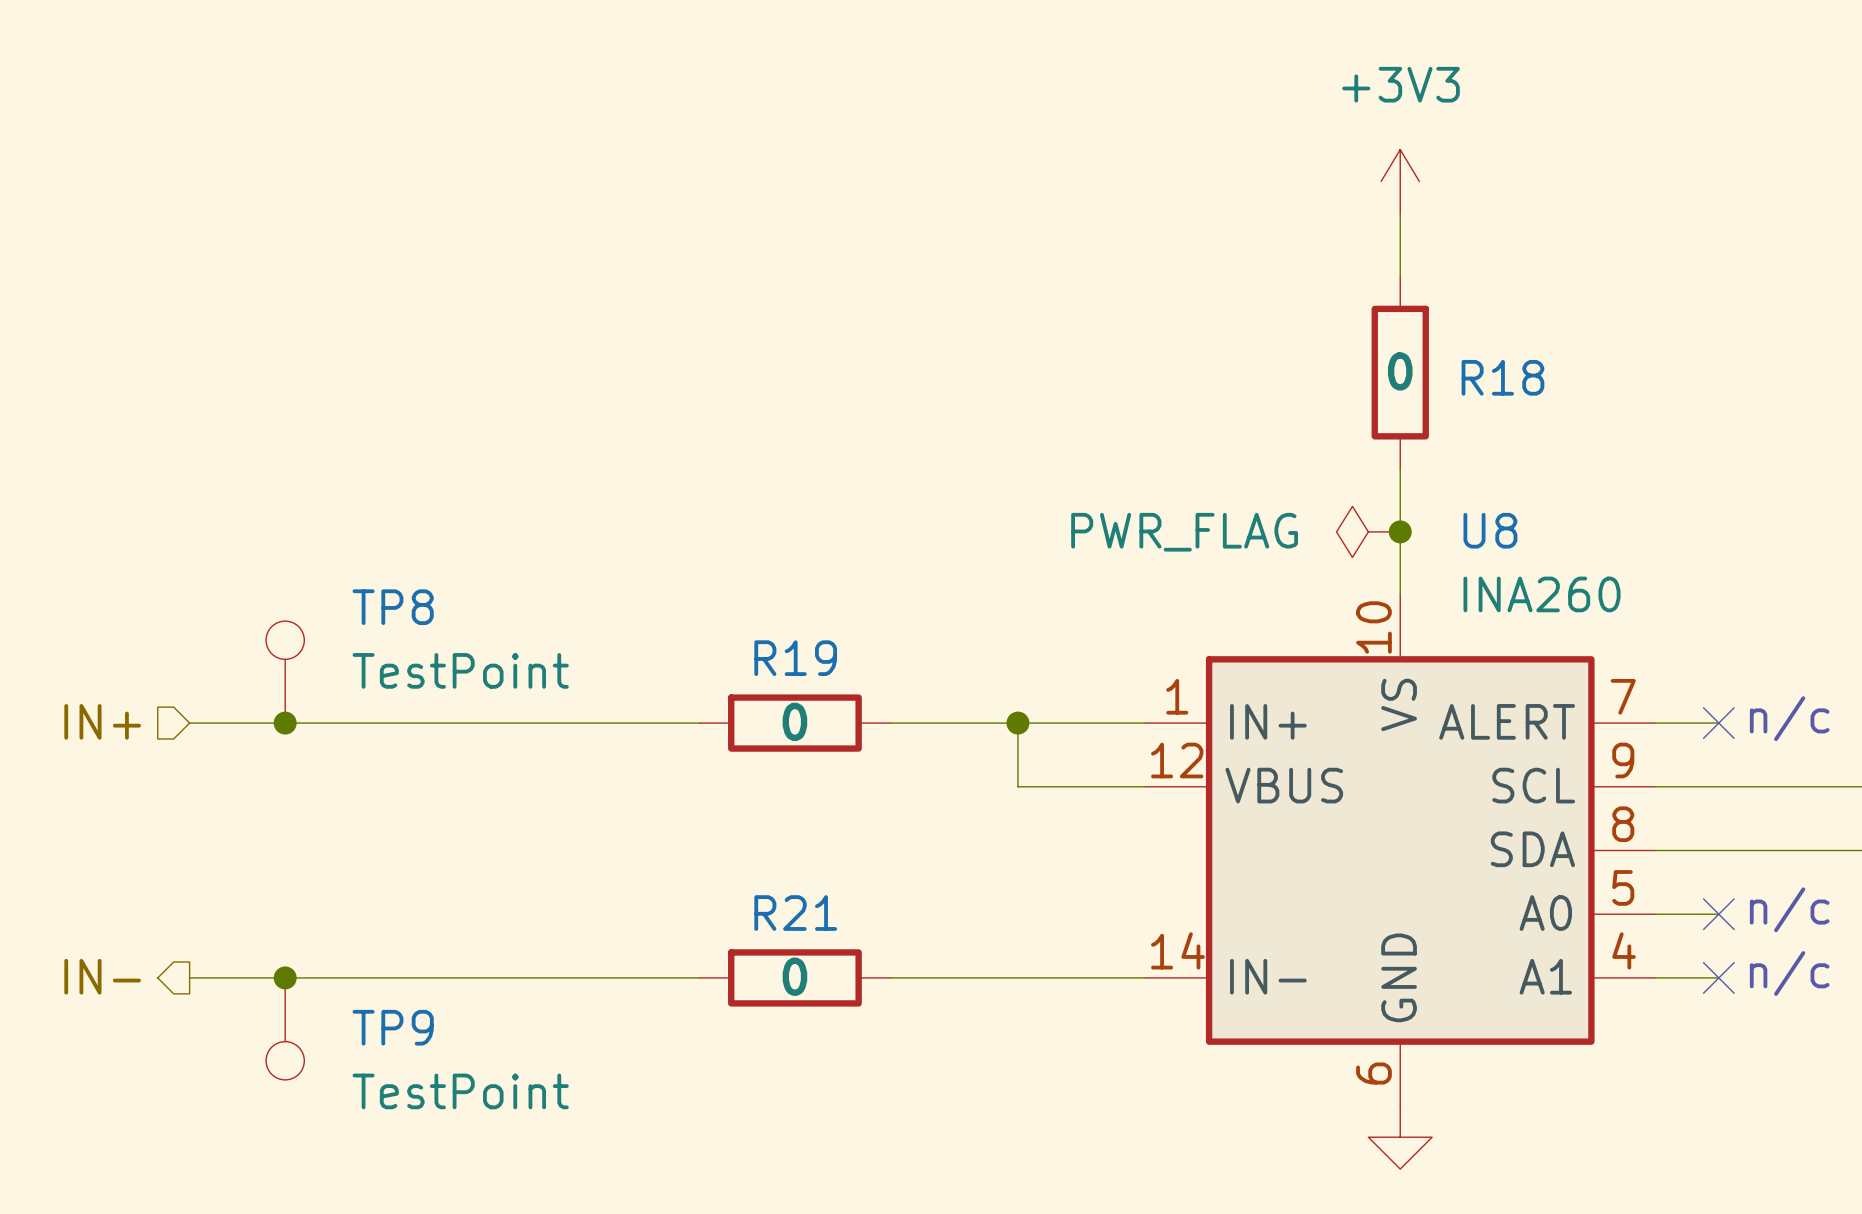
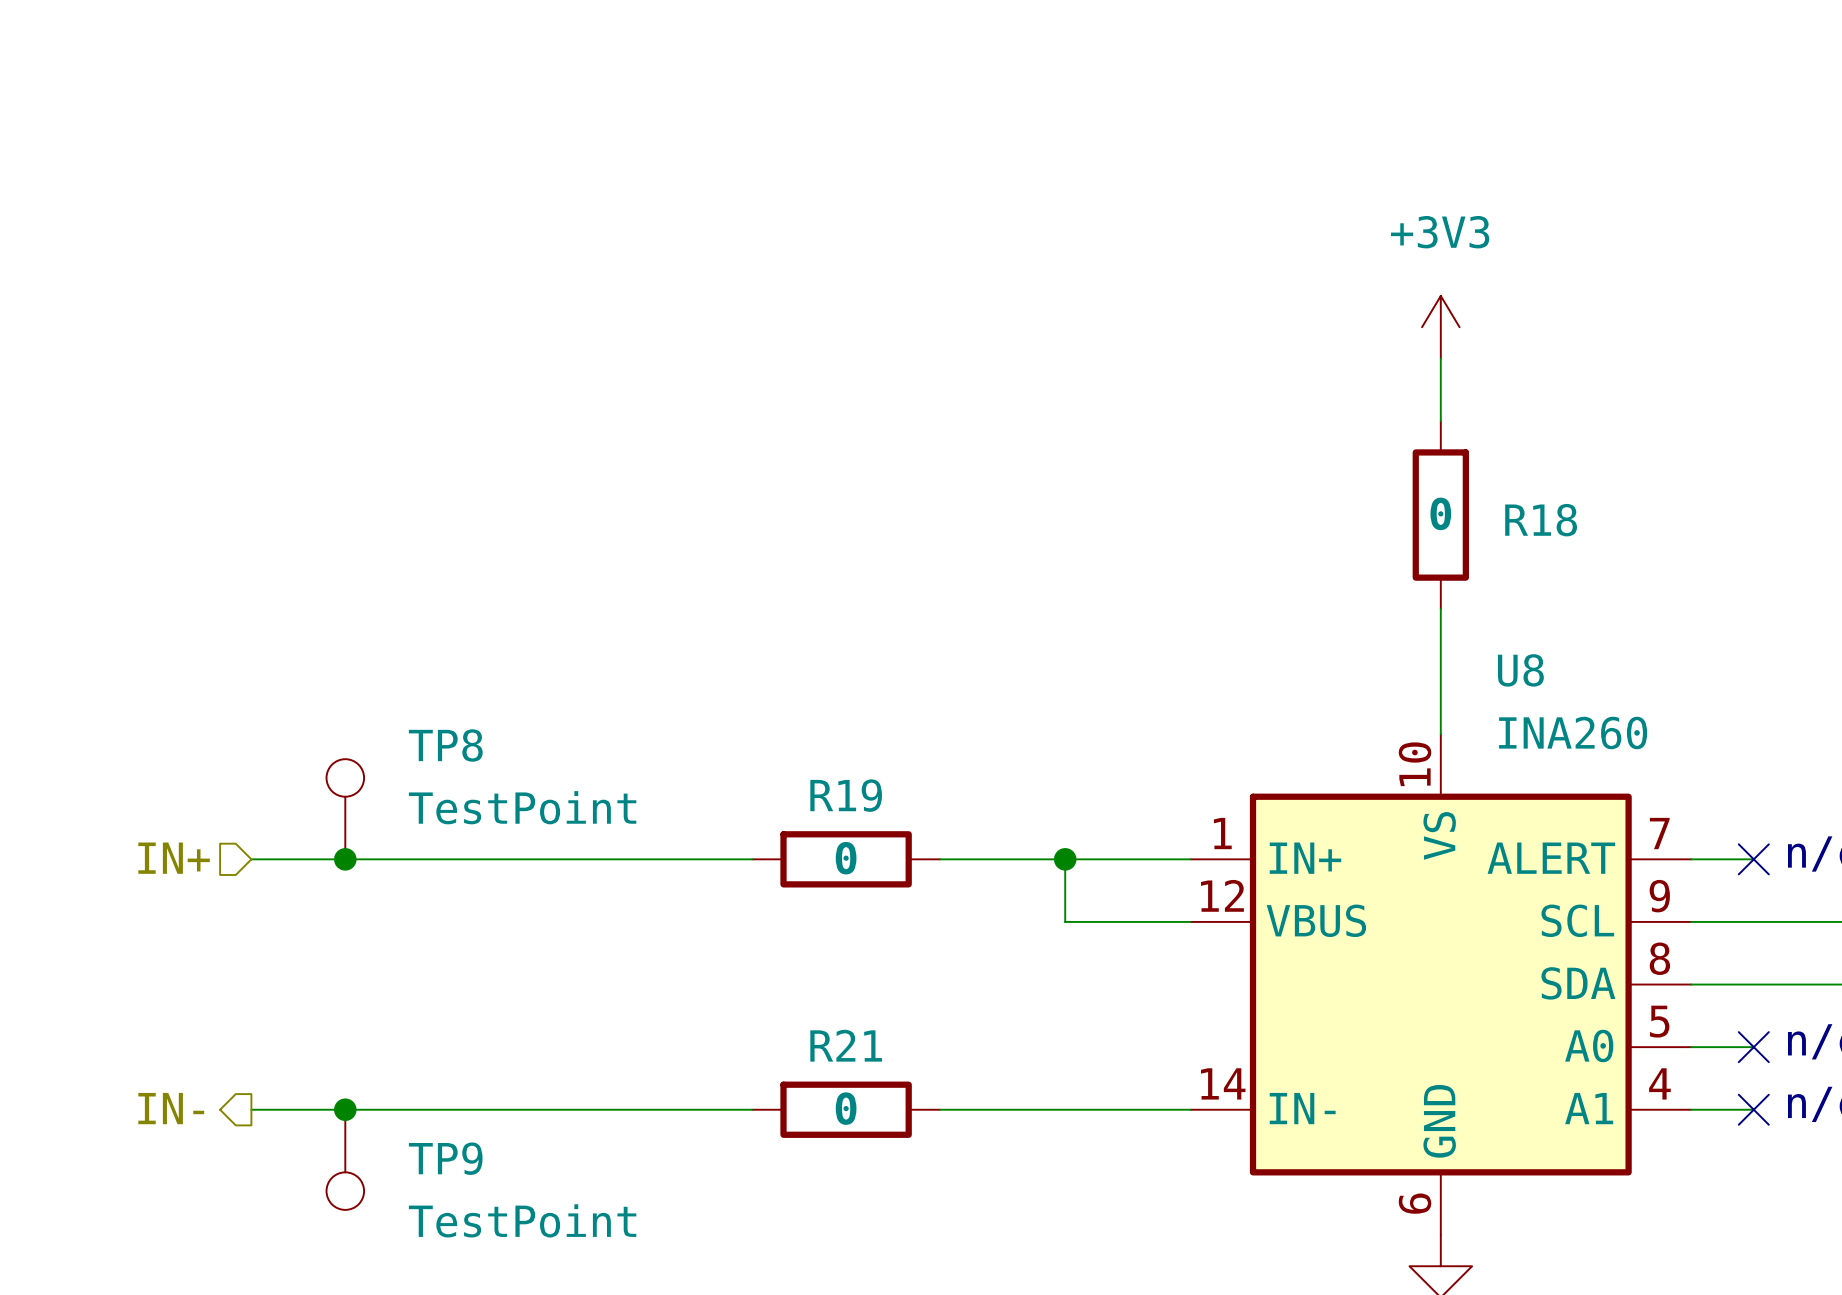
power symbol: PWR_FLAG (1368, 531) -> none
junction: (1400, 531) -> none

